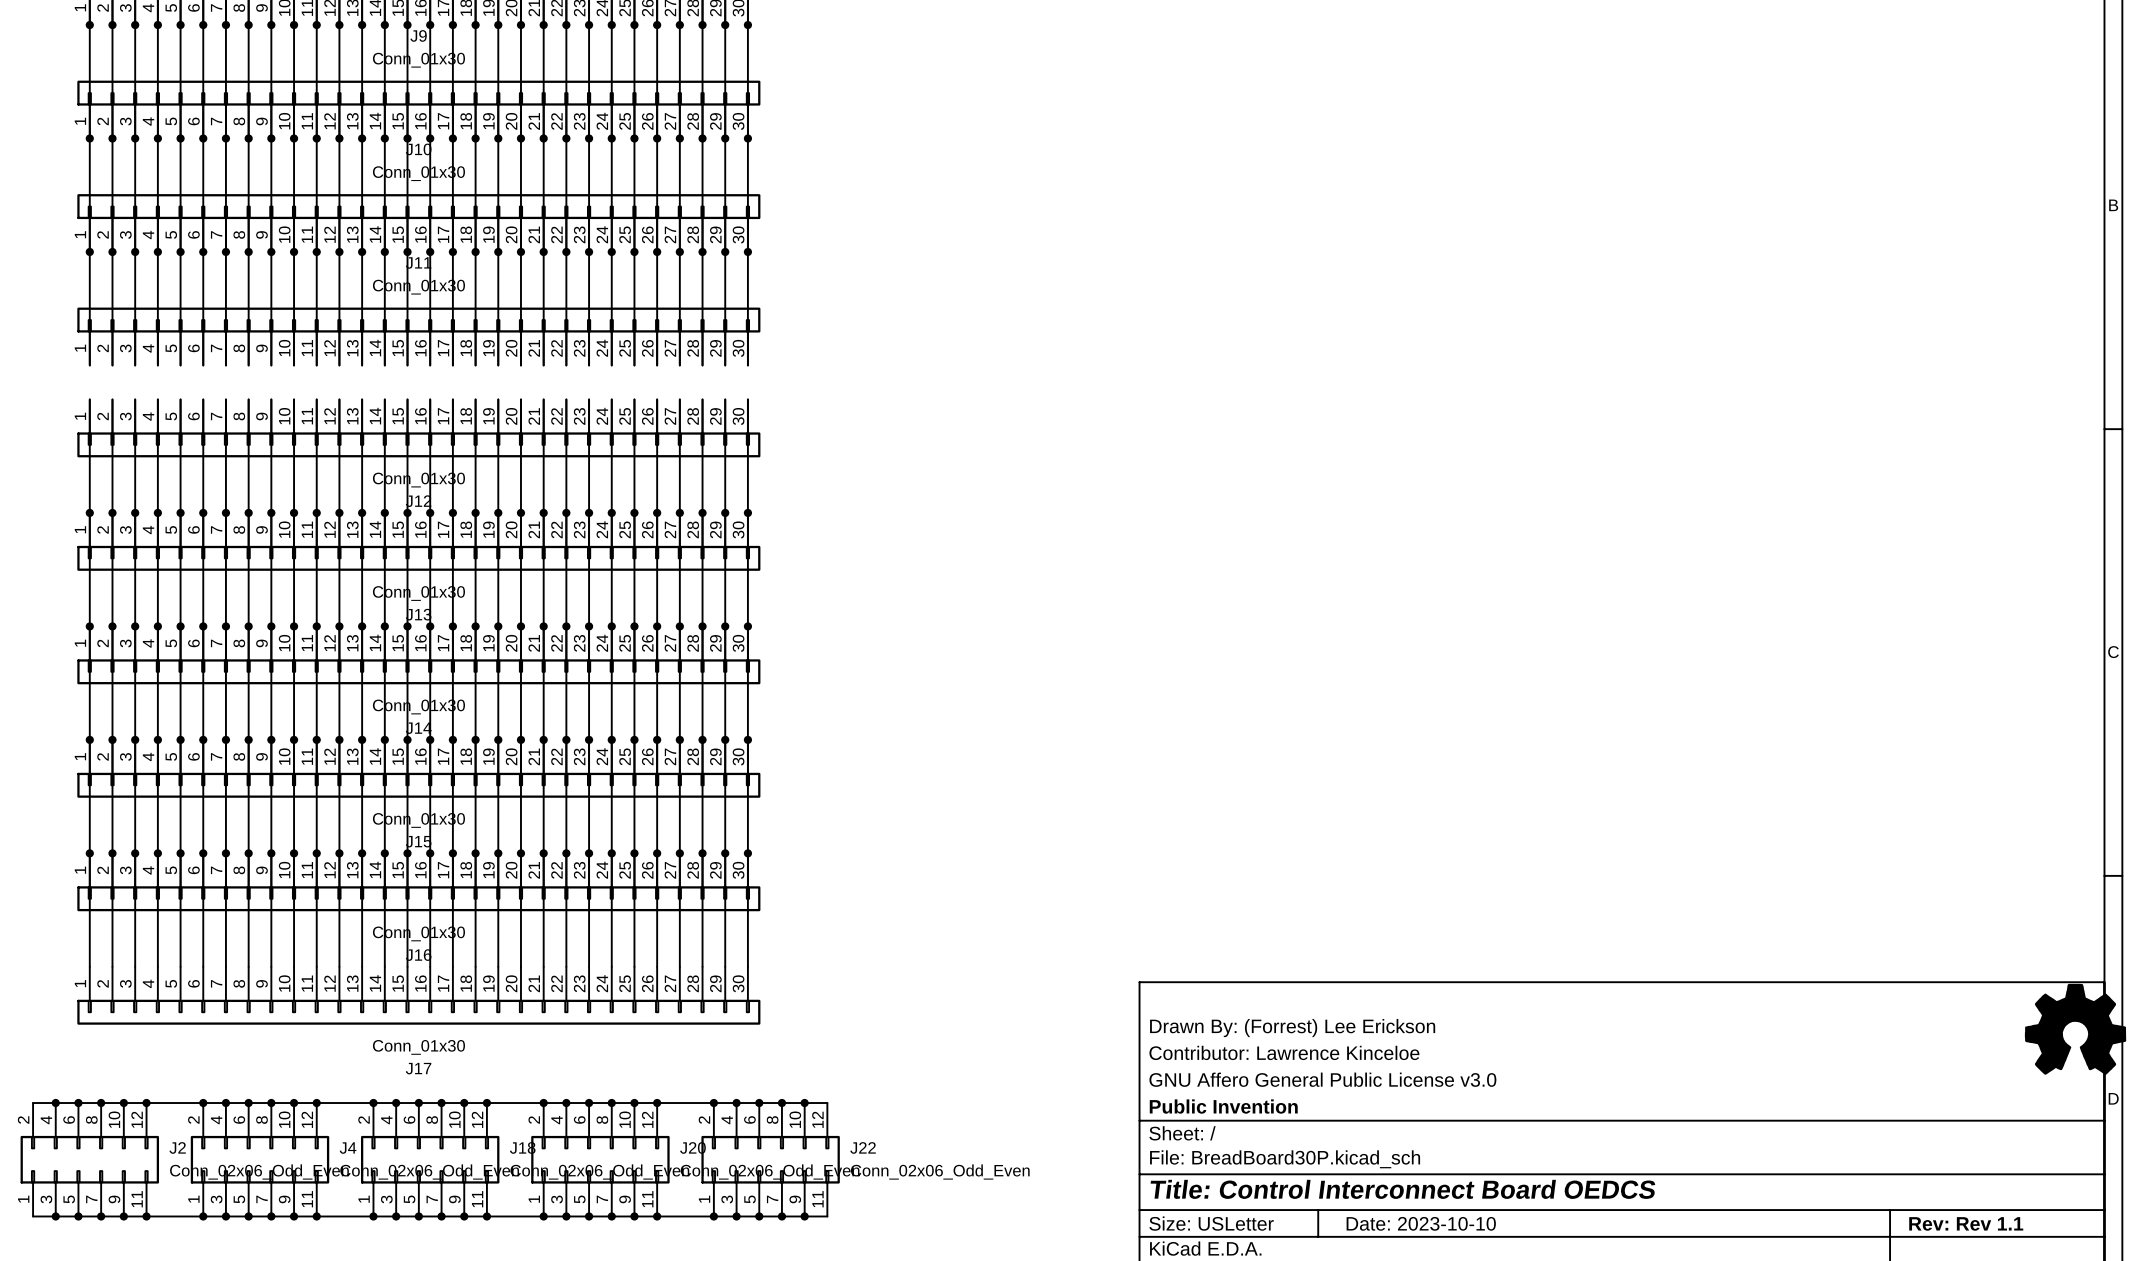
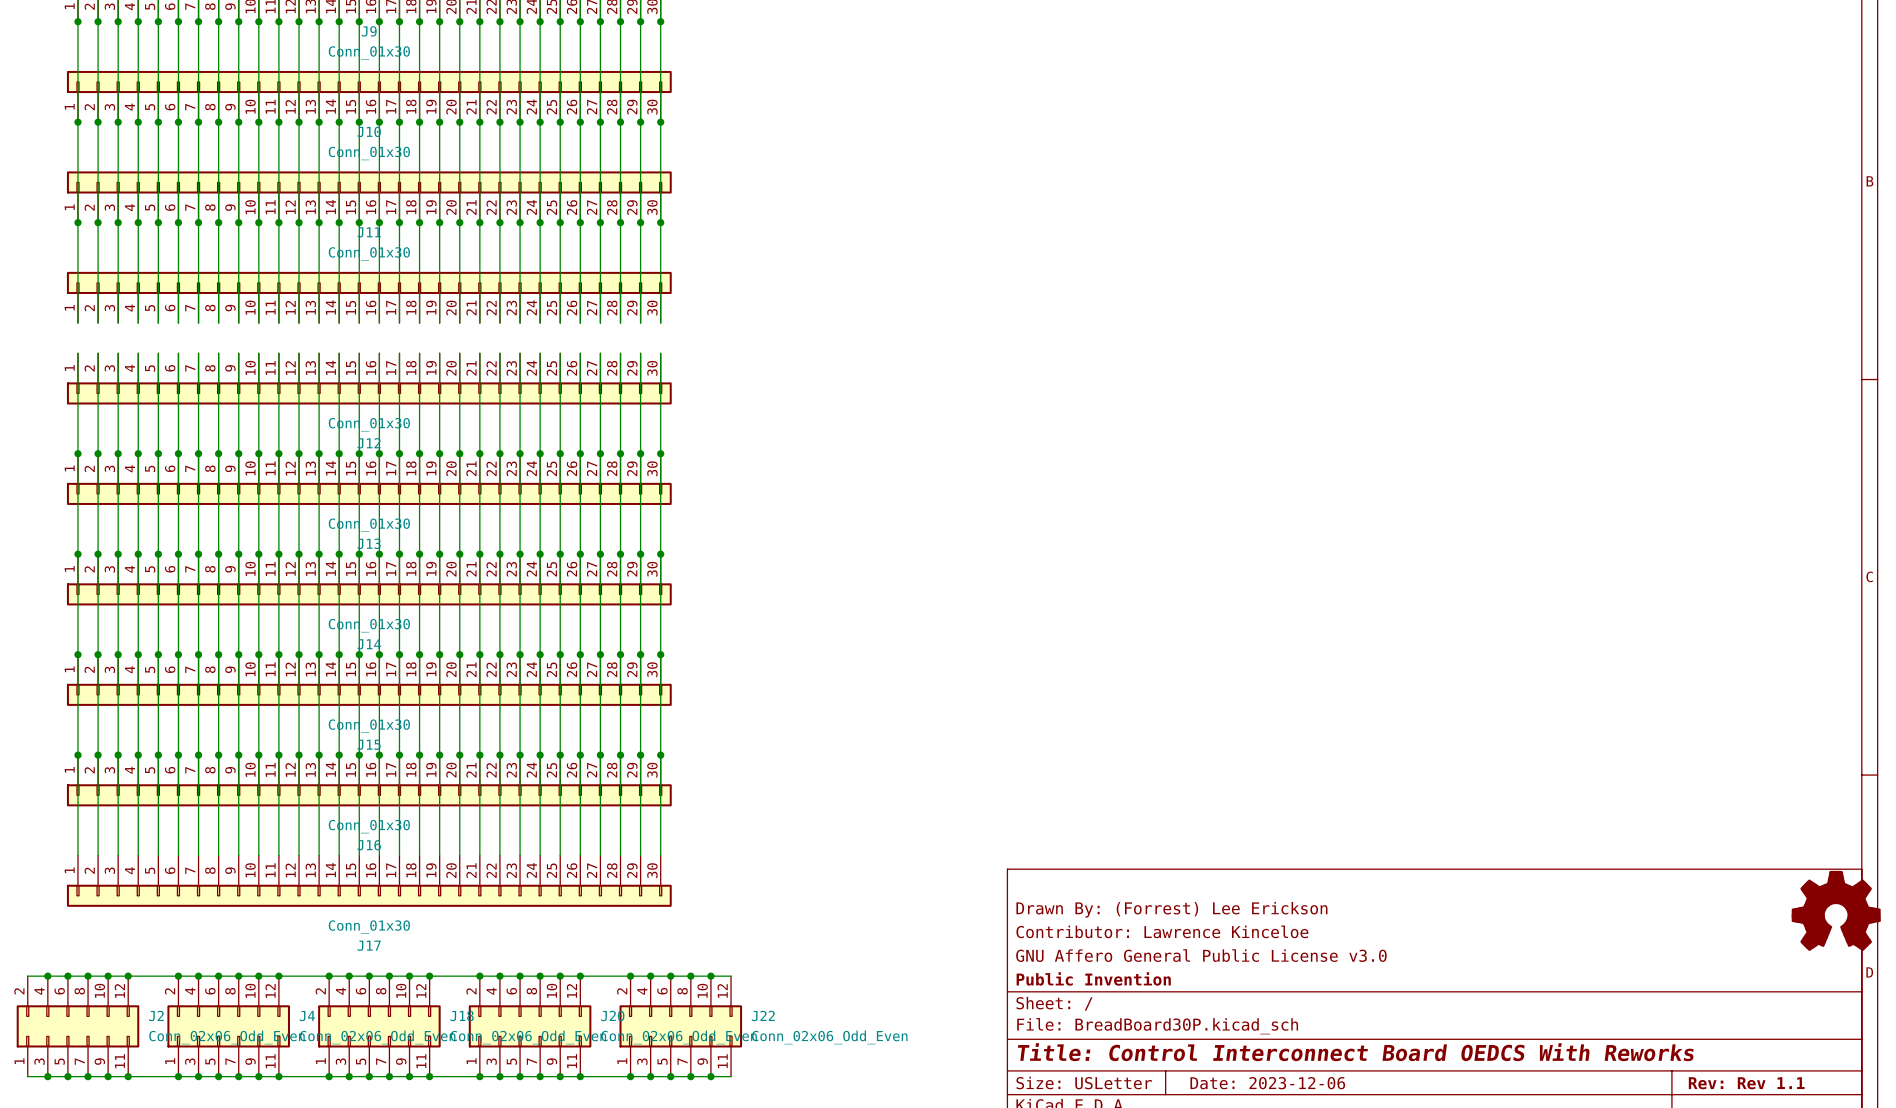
title block: Title: Control Interconnect Board OEDCS (1402, 1189) -> Title: Control Interconnect Board OEDCS With Reworks (1355, 1052)
title block: Date: 2023-10-10 (1421, 1223) -> Date: 2023-12-06 (1267, 1083)

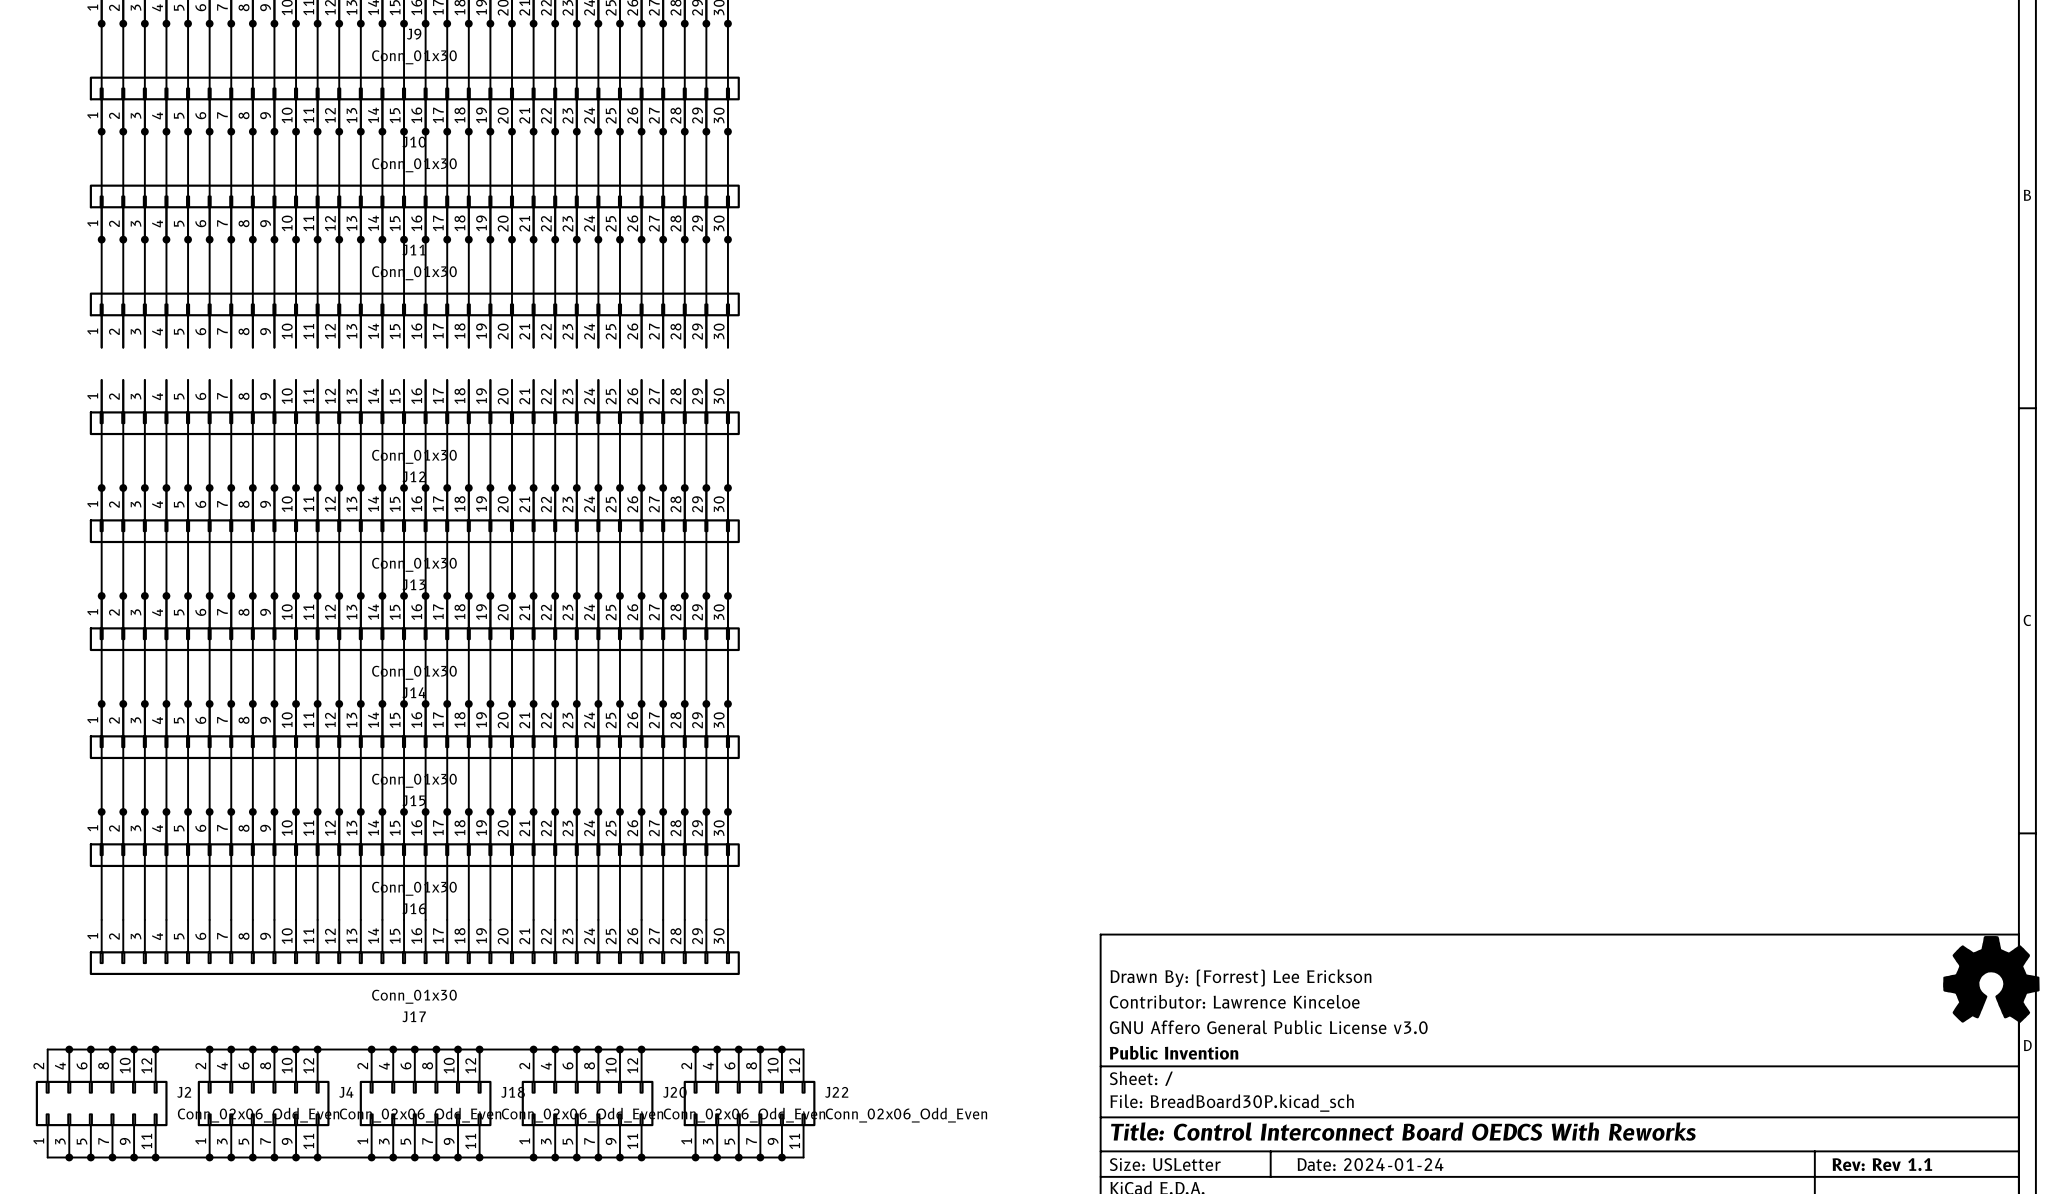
title block: Date: 2023-12-06 (1267, 1083) -> Date: 2024-01-24 (1370, 1164)

